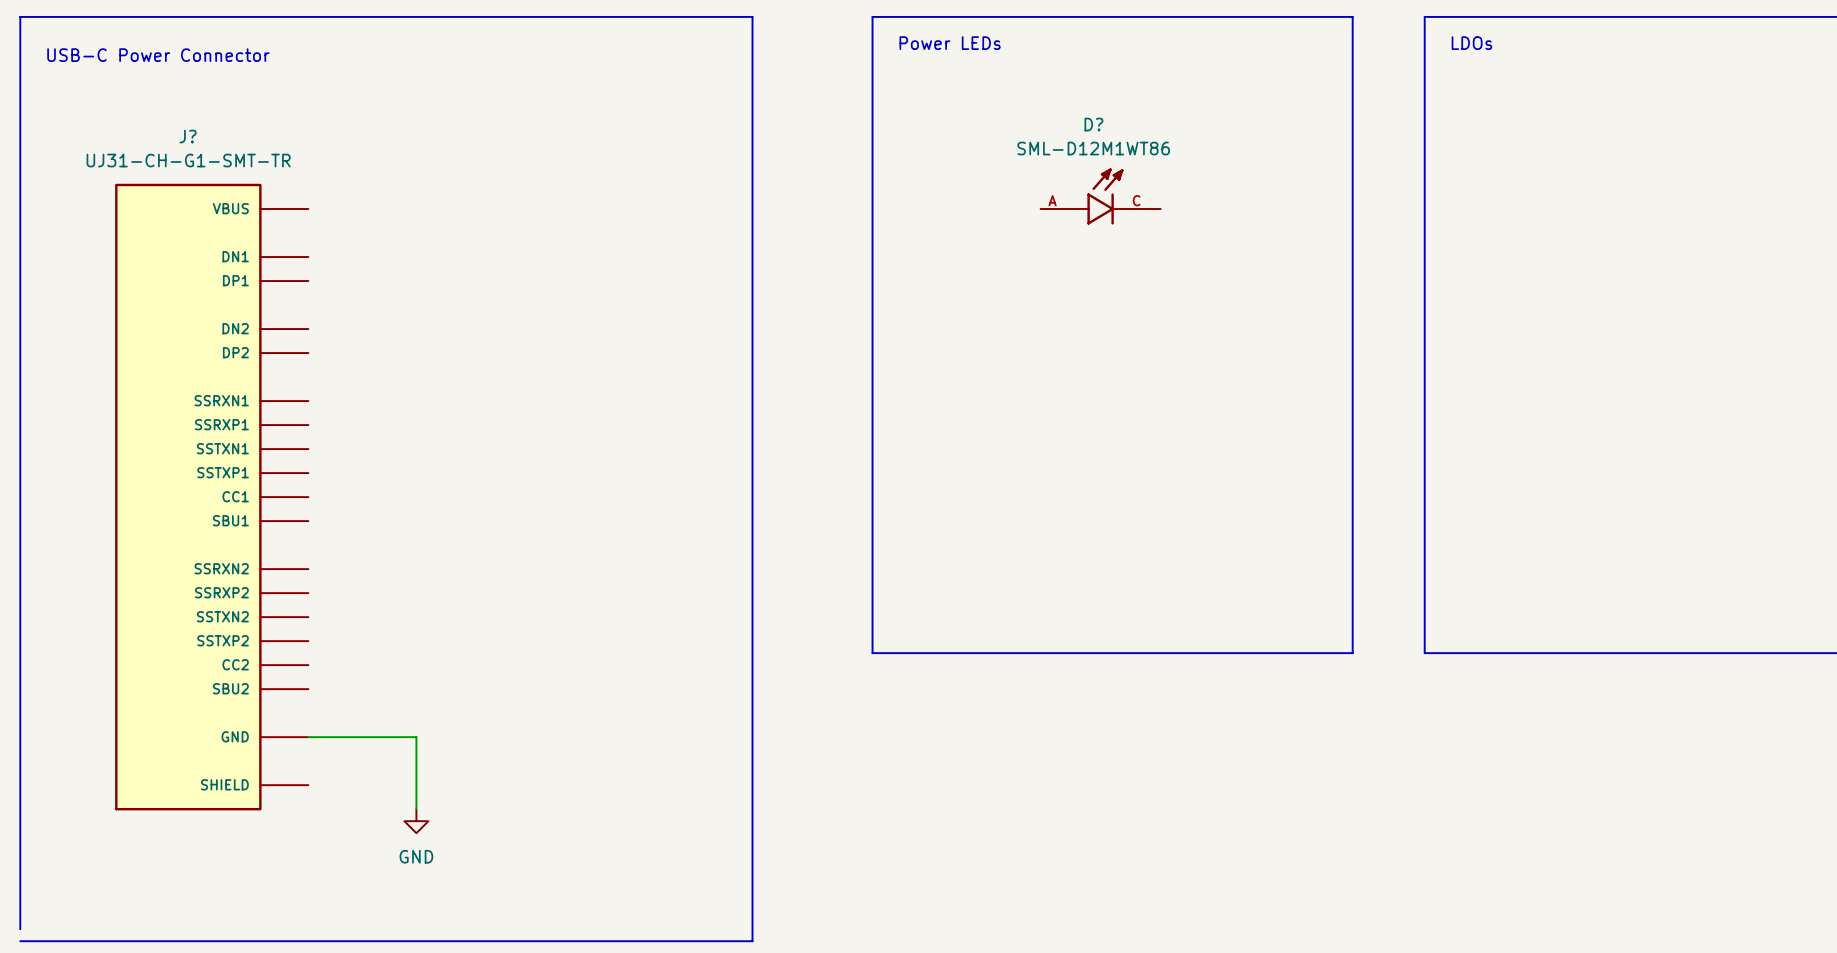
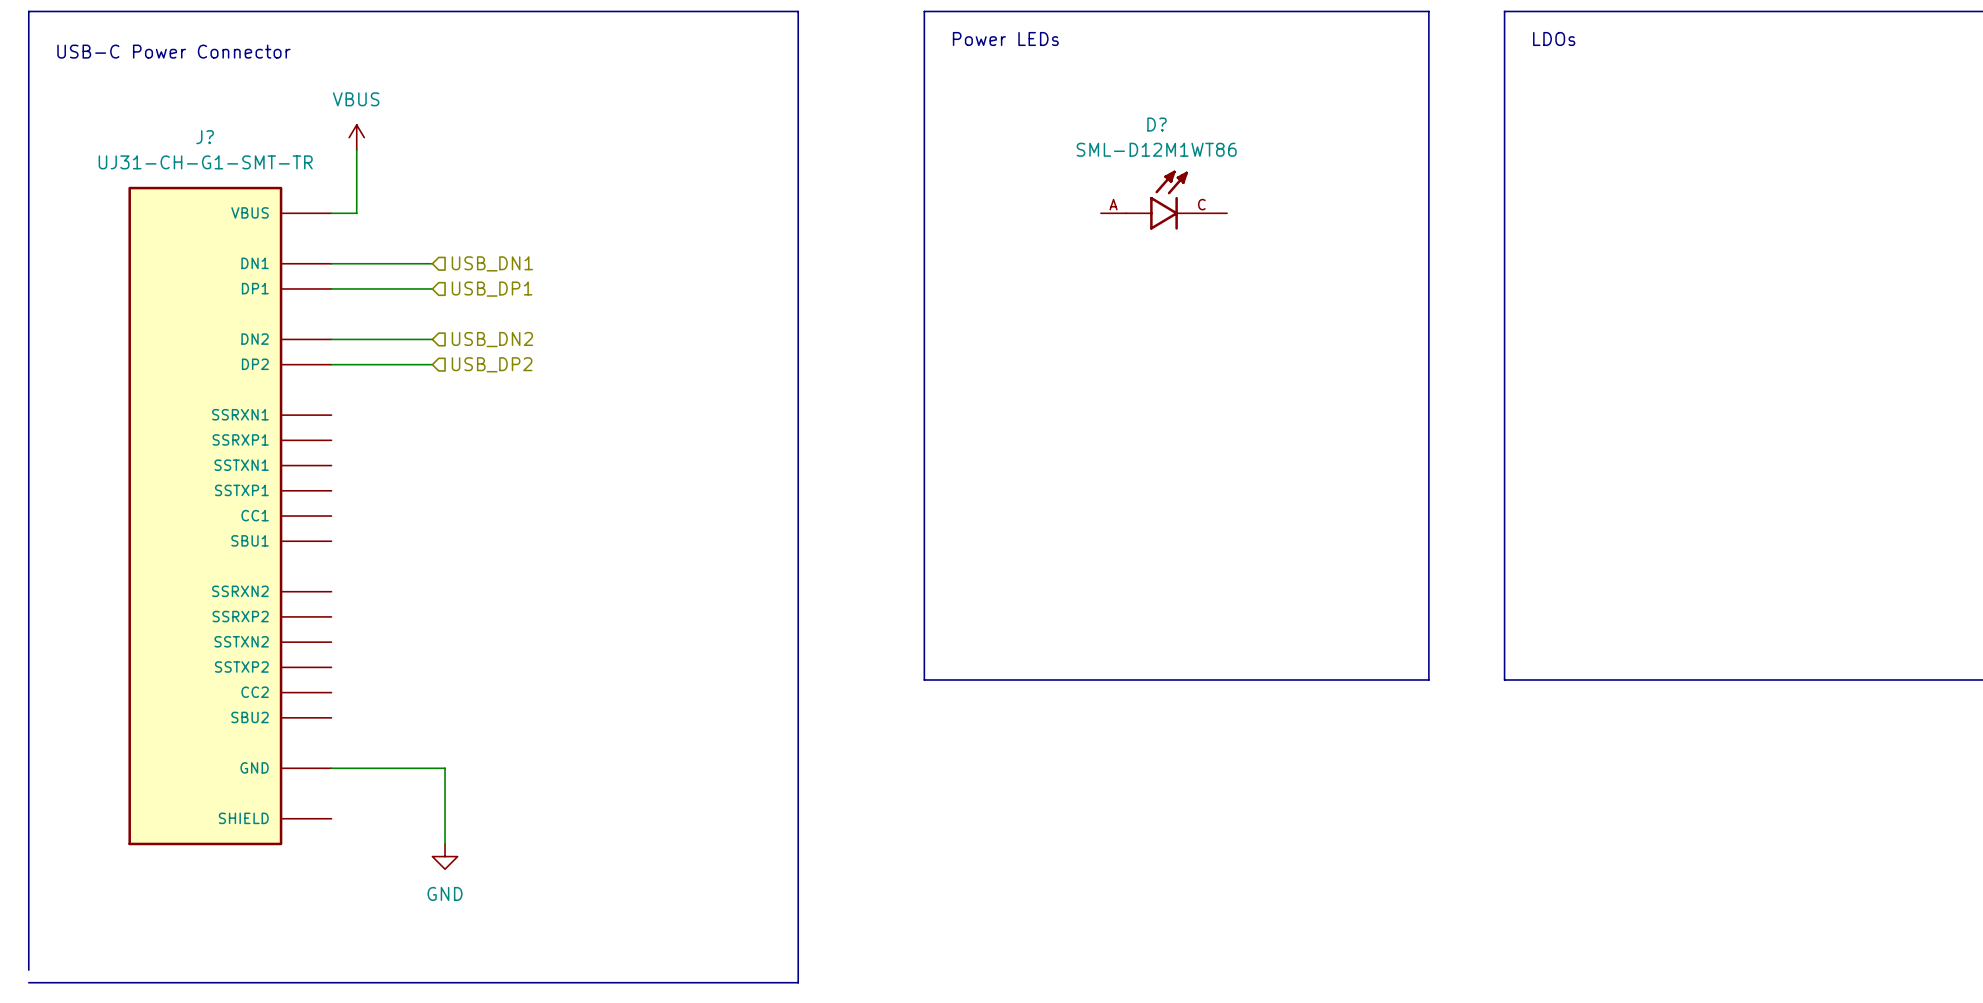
power symbol: none -> VBUS (356, 137)
wire: none -> (356, 150) (356, 213) (331, 213)
wire: none -> (331, 263) (432, 263)
hierarchical label: none -> USB_DN1 (492, 263)
wire: none -> (331, 288) (432, 288)
hierarchical label: none -> USB_DP1 (492, 289)
wire: none -> (331, 339) (432, 339)
hierarchical label: none -> USB_DN2 (492, 339)
wire: none -> (331, 364) (432, 364)
hierarchical label: none -> USB_DP2 (492, 364)

